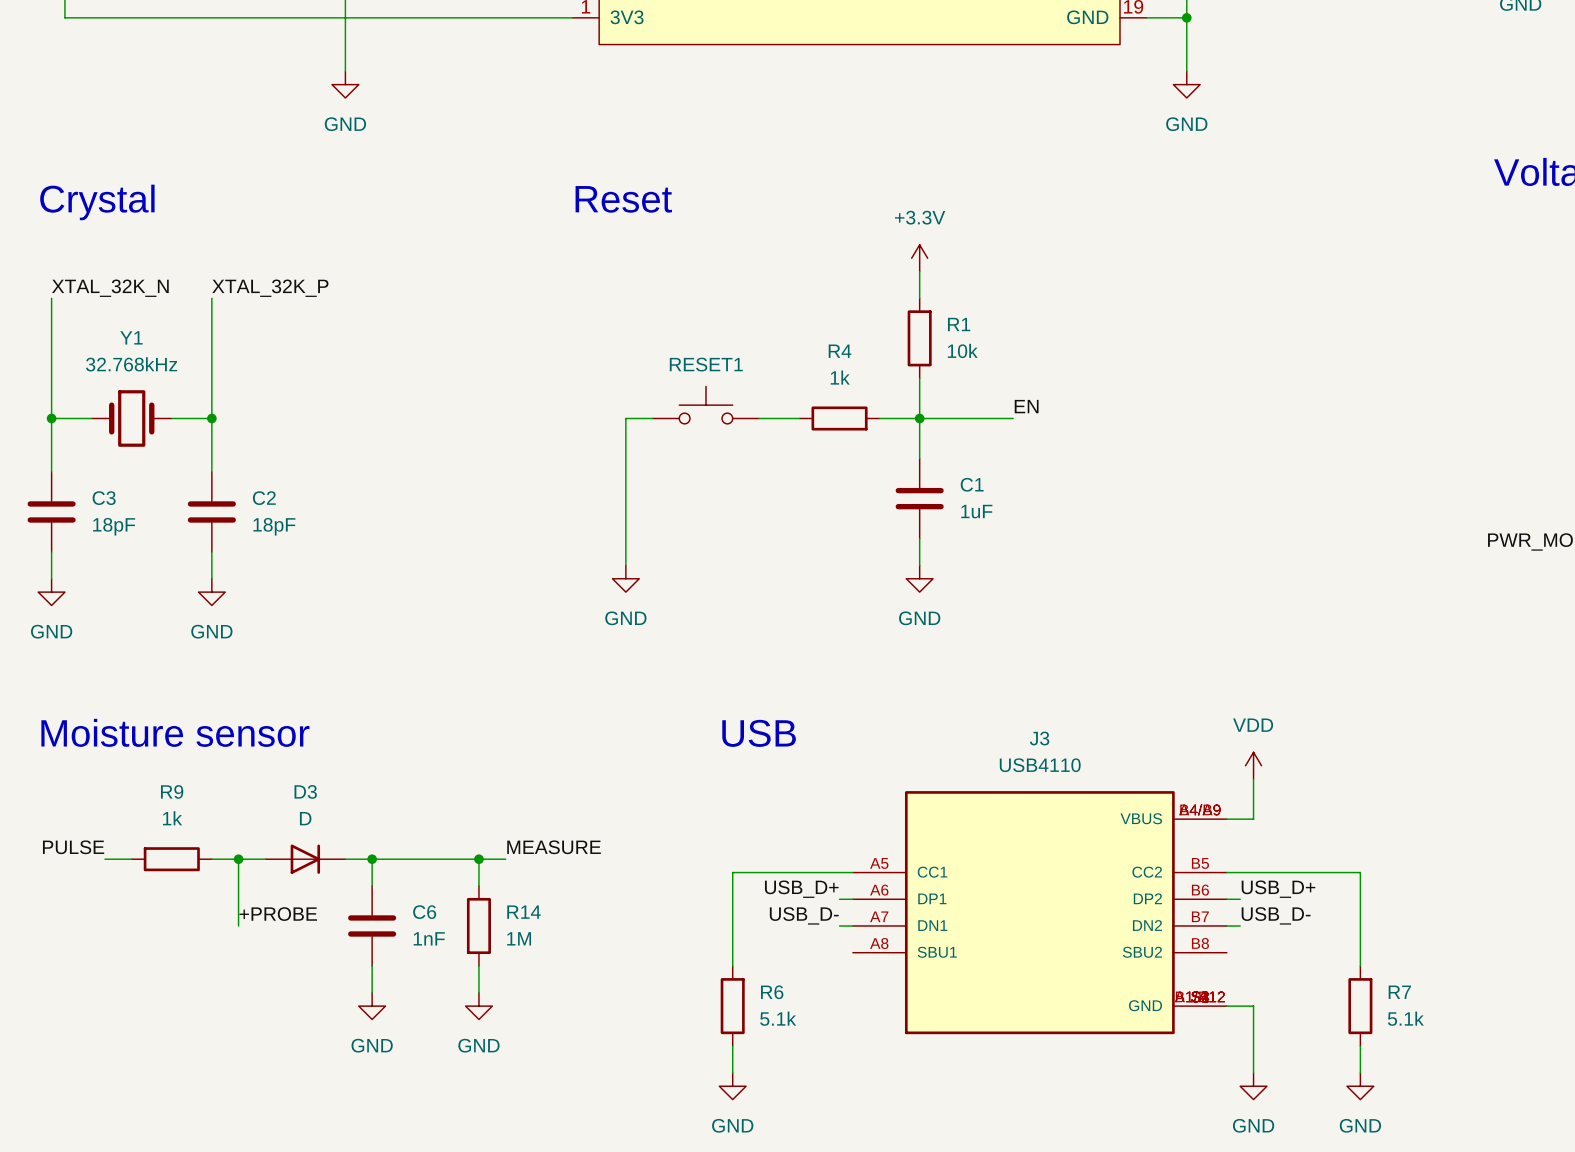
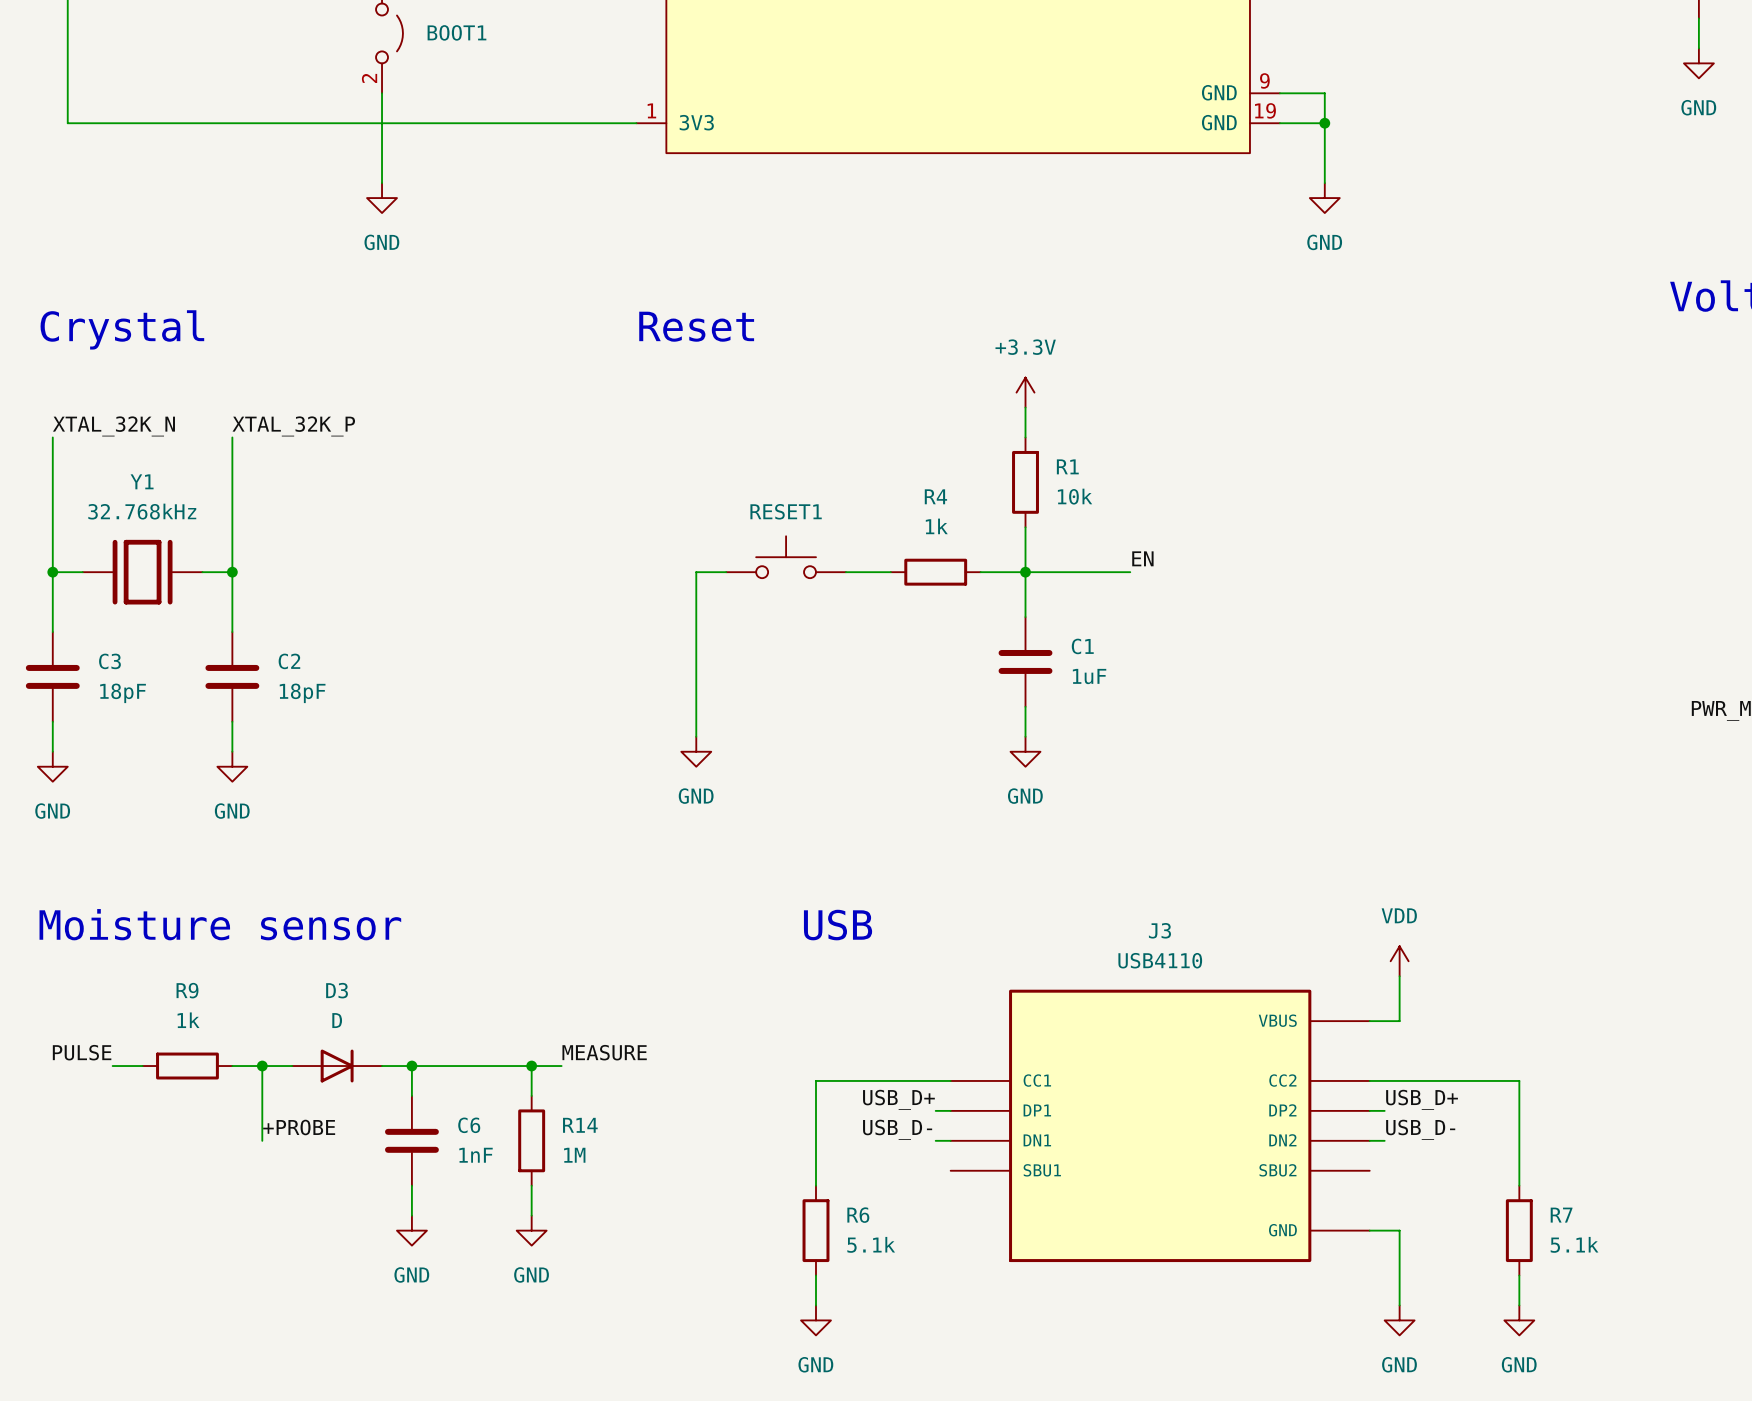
Y1 symbol: [91, 390, 172, 447] -> [82, 539, 203, 605]
J3 symbol: [852, 791, 1227, 1035] -> [950, 989, 1370, 1263]

